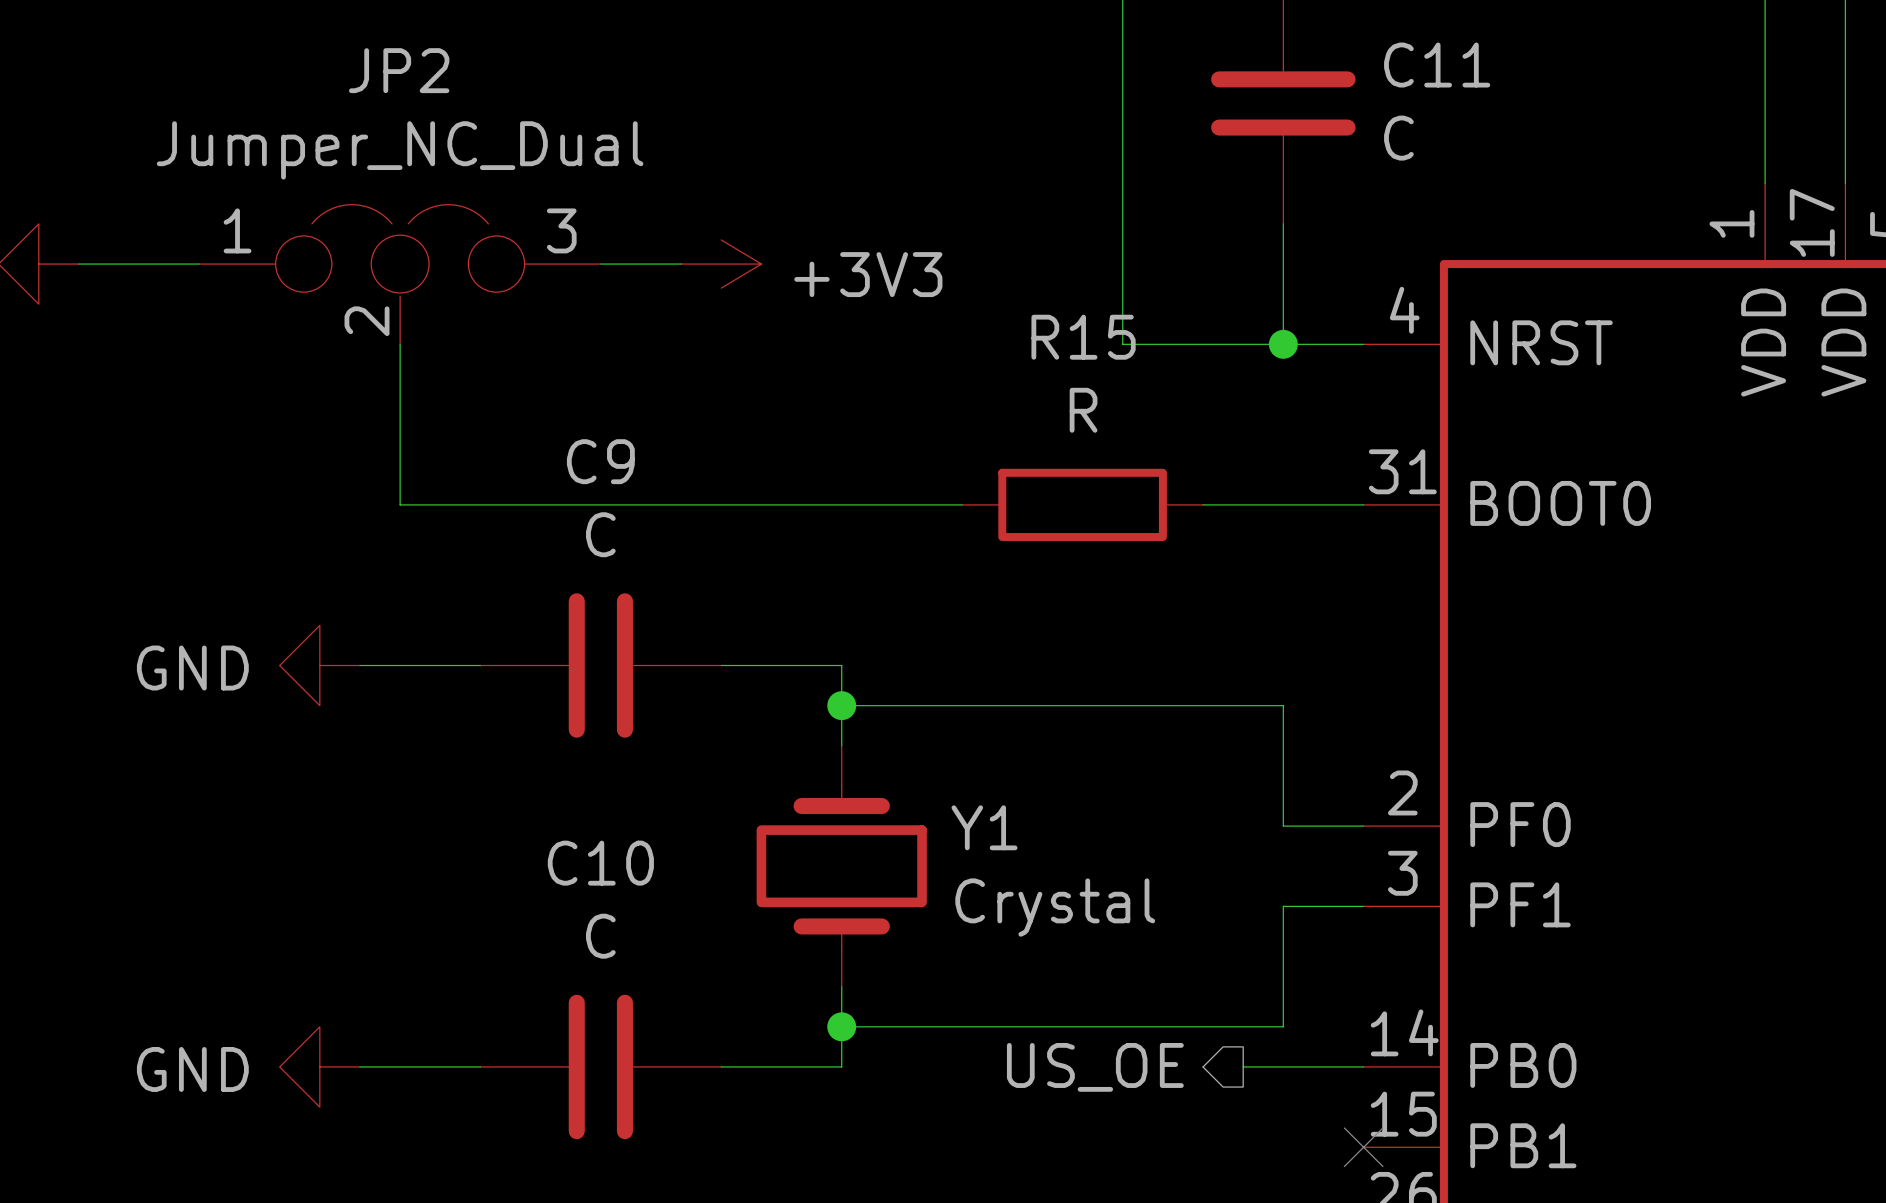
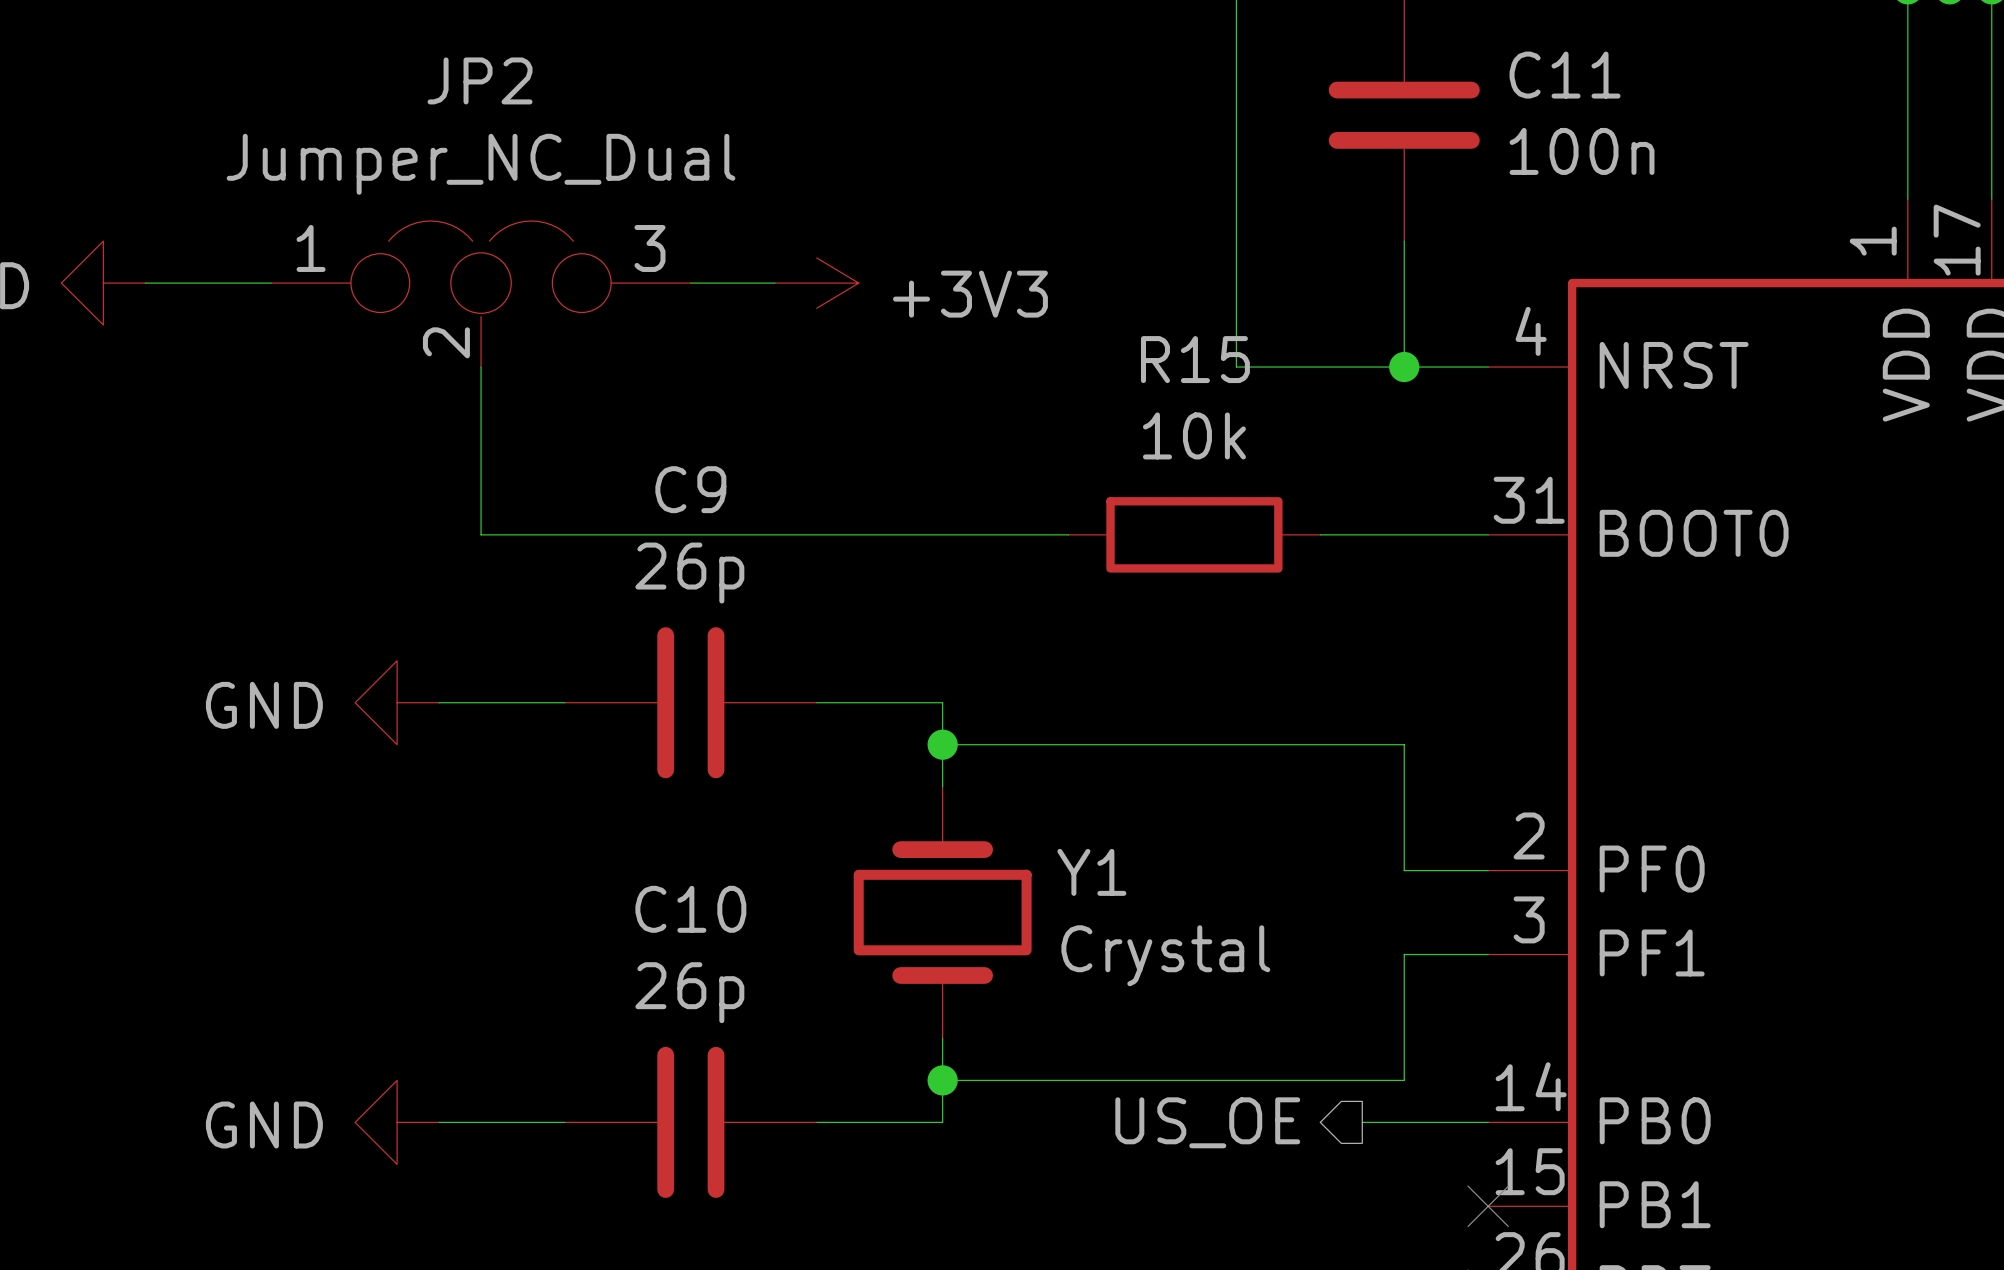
C11 value: C (1398, 138) -> 100n (1582, 151)
R15 value: R (1083, 410) -> 10k (1194, 435)
C9 value: C (600, 534) -> 26p (689, 573)
C10 value: C (600, 936) -> 26p (689, 992)

